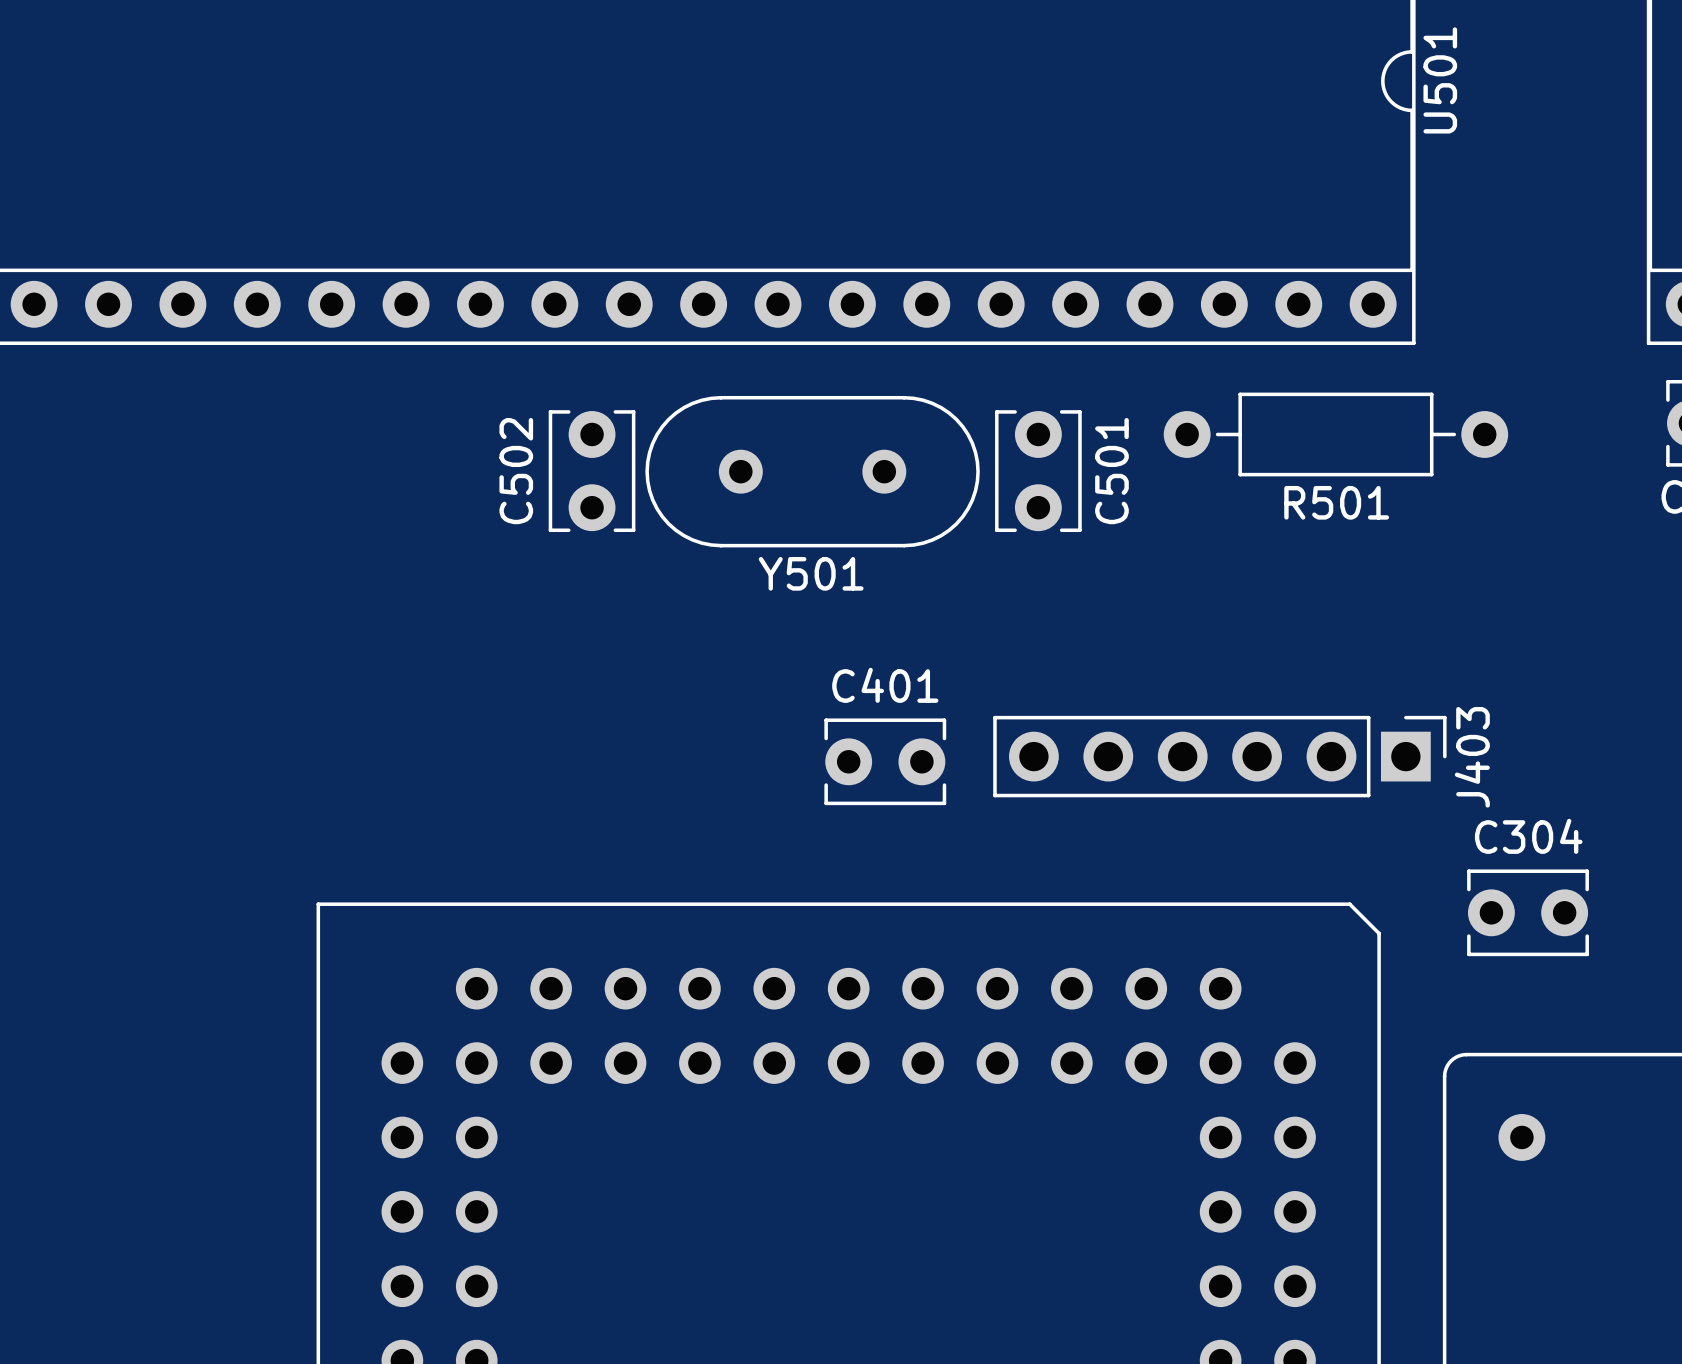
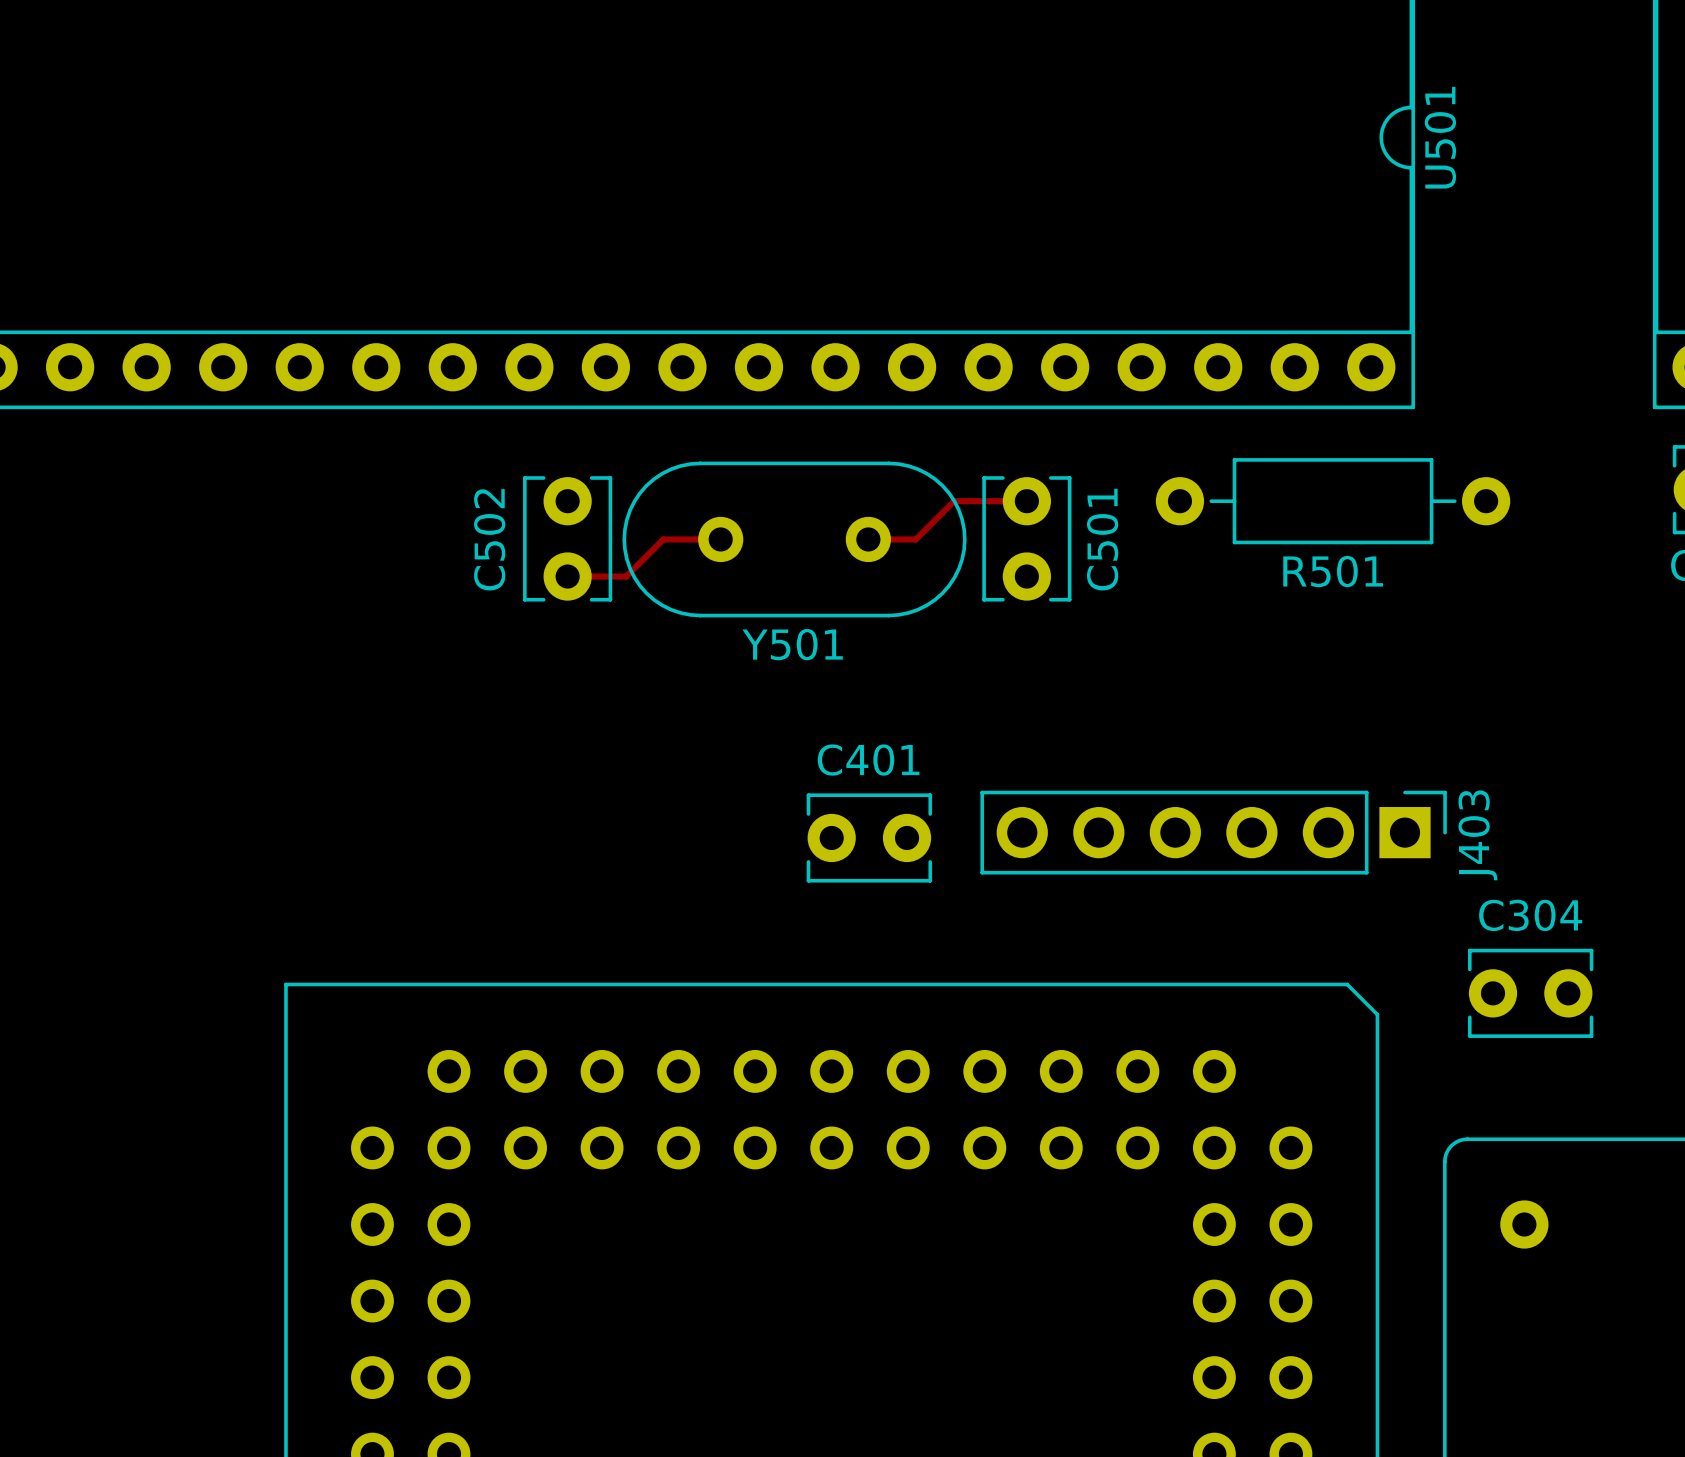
track: none -> (1026, 501) (954, 501) (915, 539) (868, 539)
track: none -> (720, 539) (663, 539) (626, 576) (567, 576)

